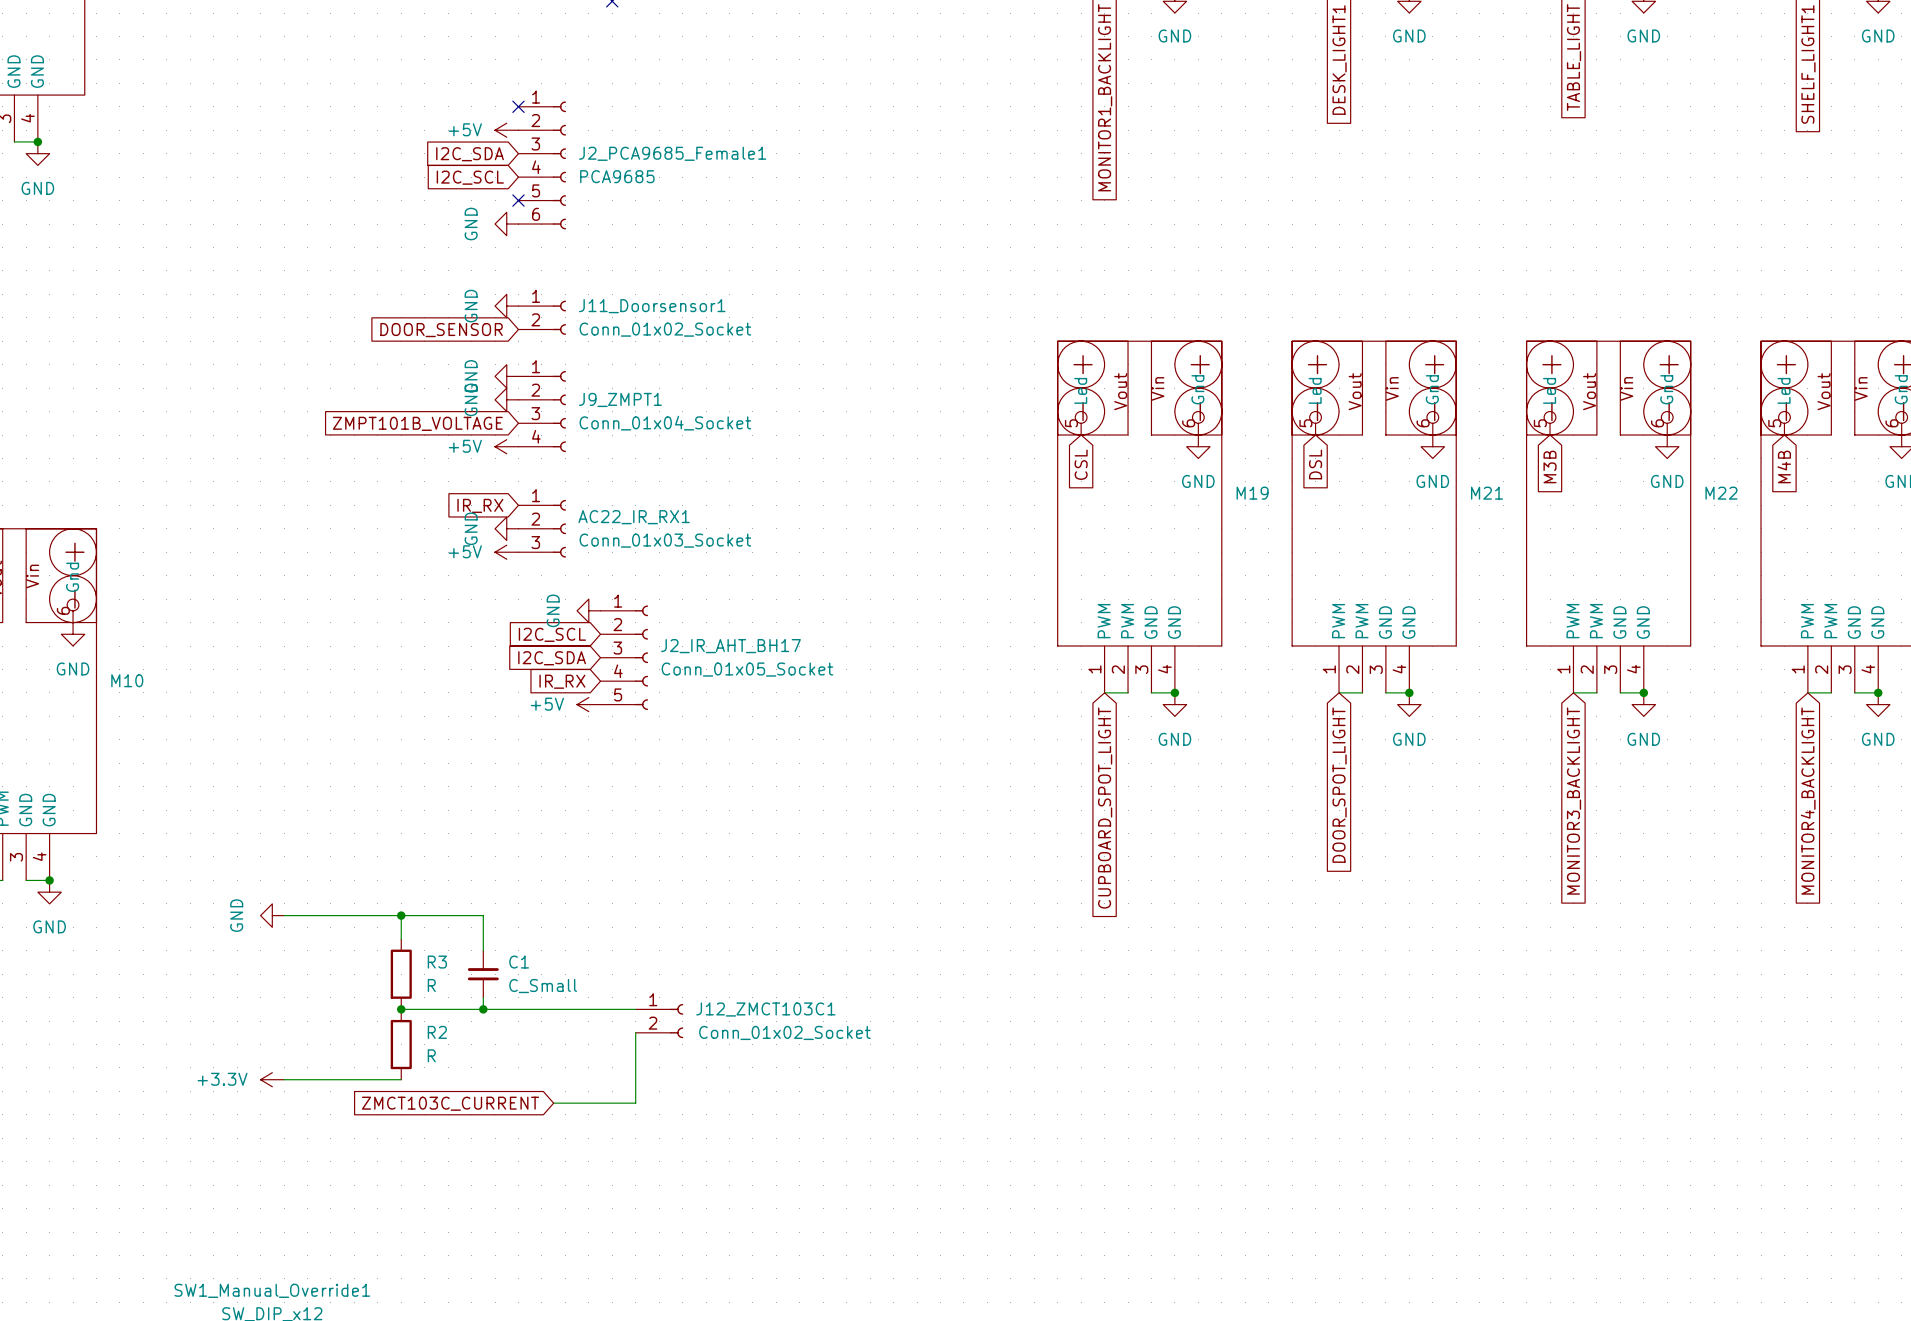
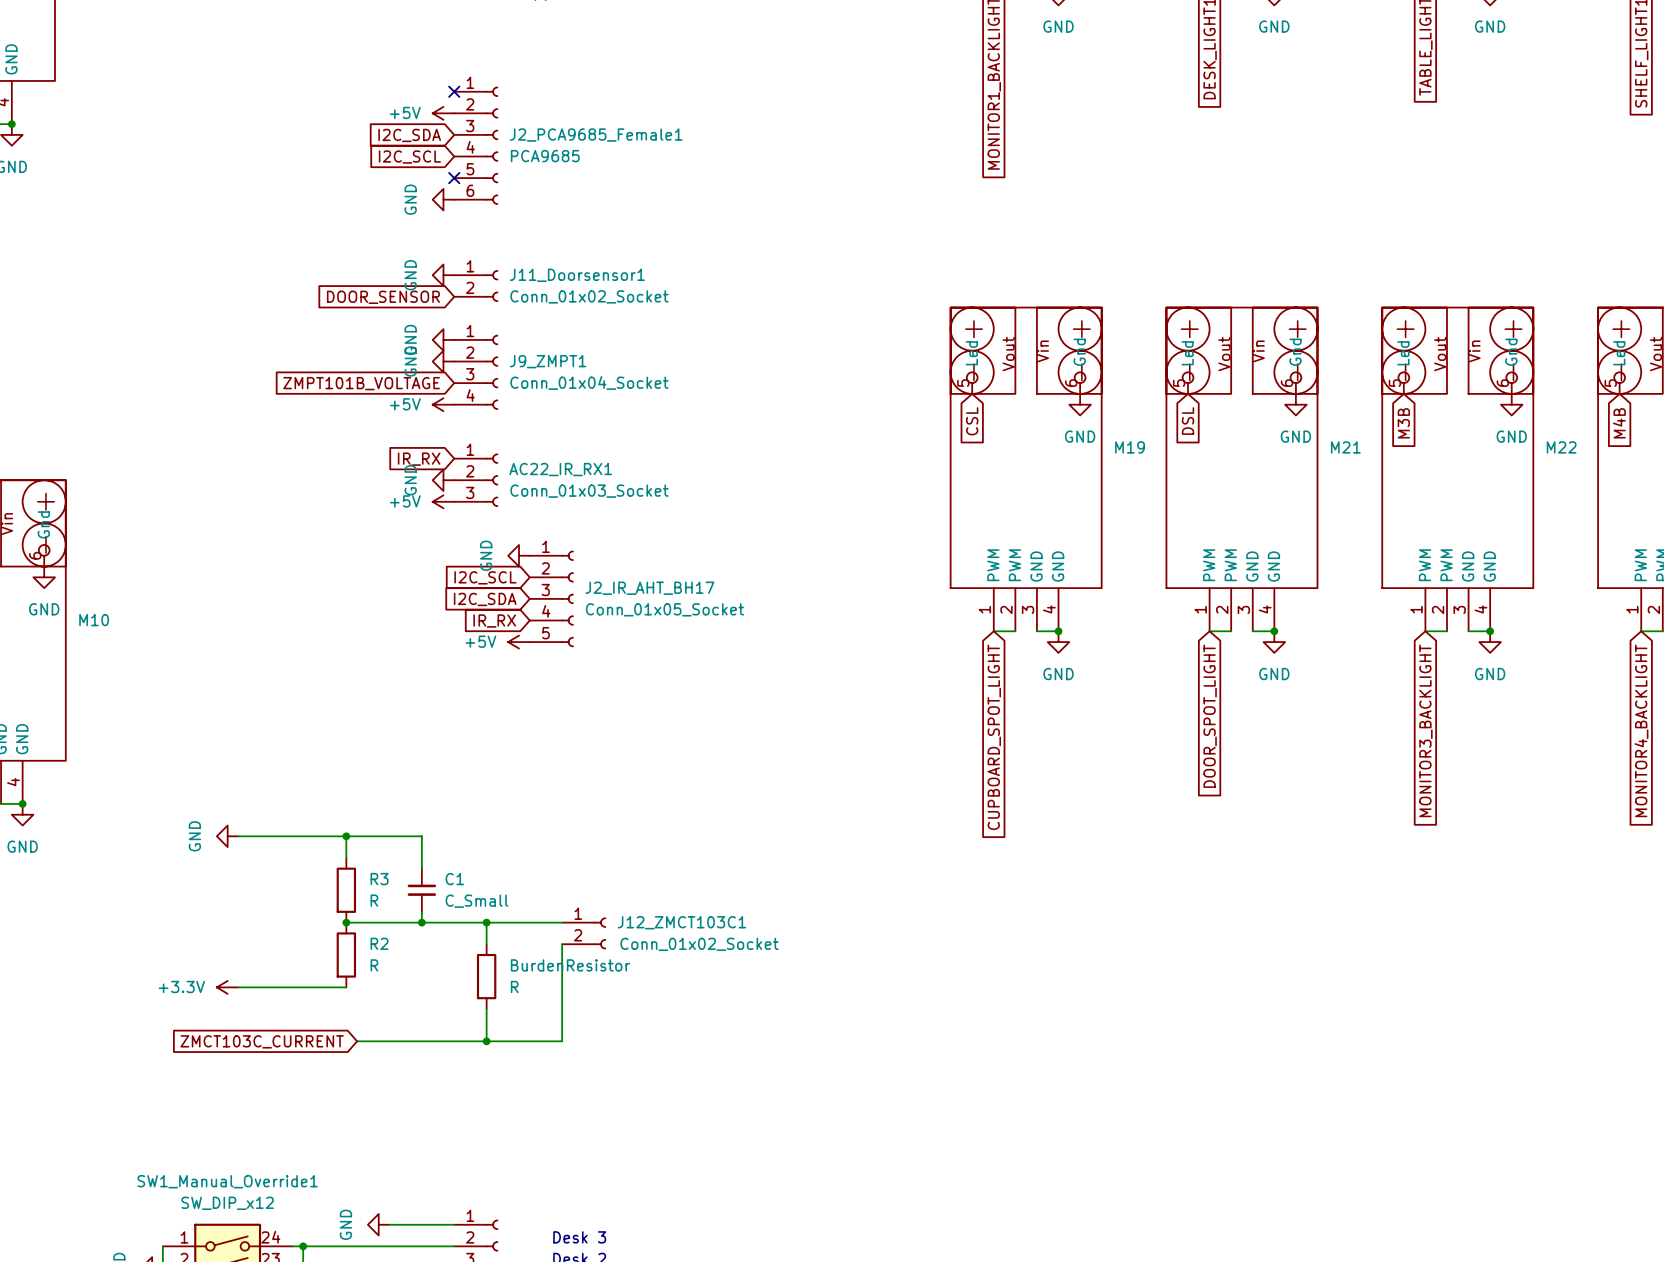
wire: none -> (486, 922) (486, 944)
junction: none -> (486, 922)
BurdenResistor: none -> R (486, 976)
global label position: ZMCT103C_CURRENT (450, 1103) -> ZMCT103C_CURRENT (262, 1041)
wire: (553, 1103) (635, 1103) -> (486, 1008) (486, 1041)
wire: none -> (562, 1008) (562, 1041) (357, 1041)
junction: none -> (486, 1041)

